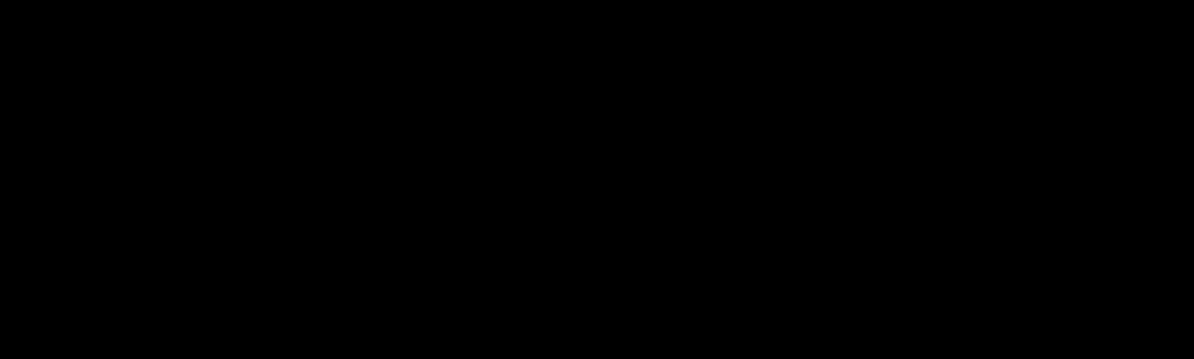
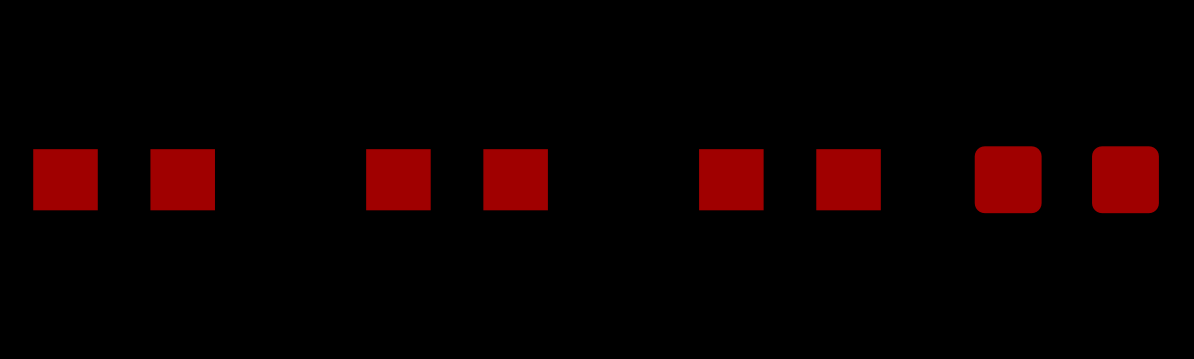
part: none -> (124, 179)
part: none -> (457, 179)
part: none -> (789, 179)
part: none -> (1066, 179)

